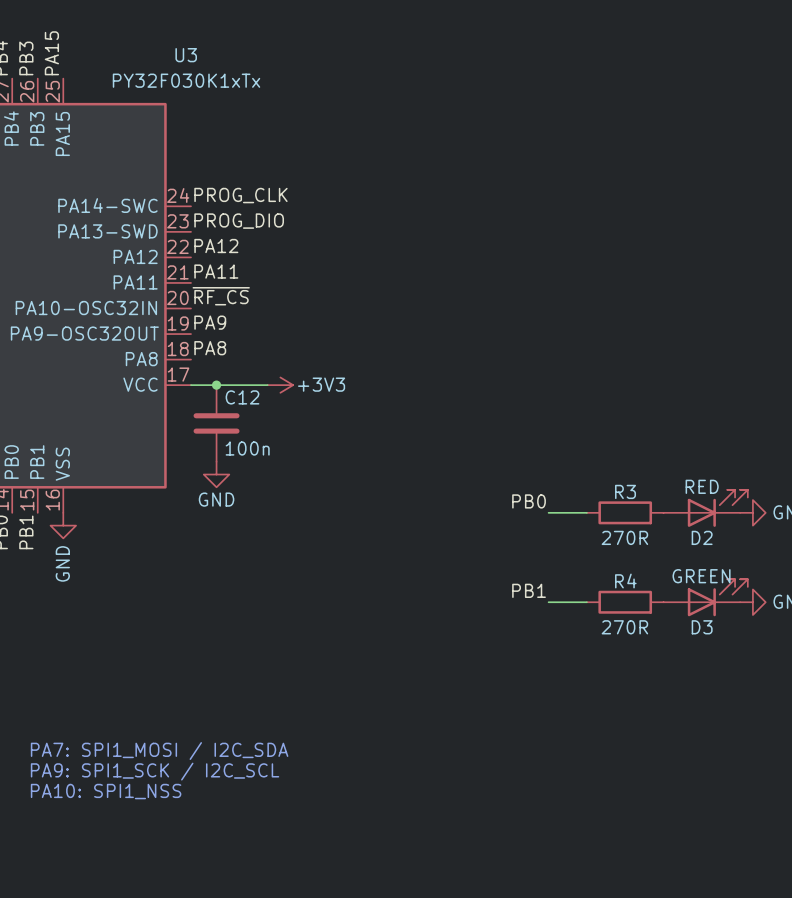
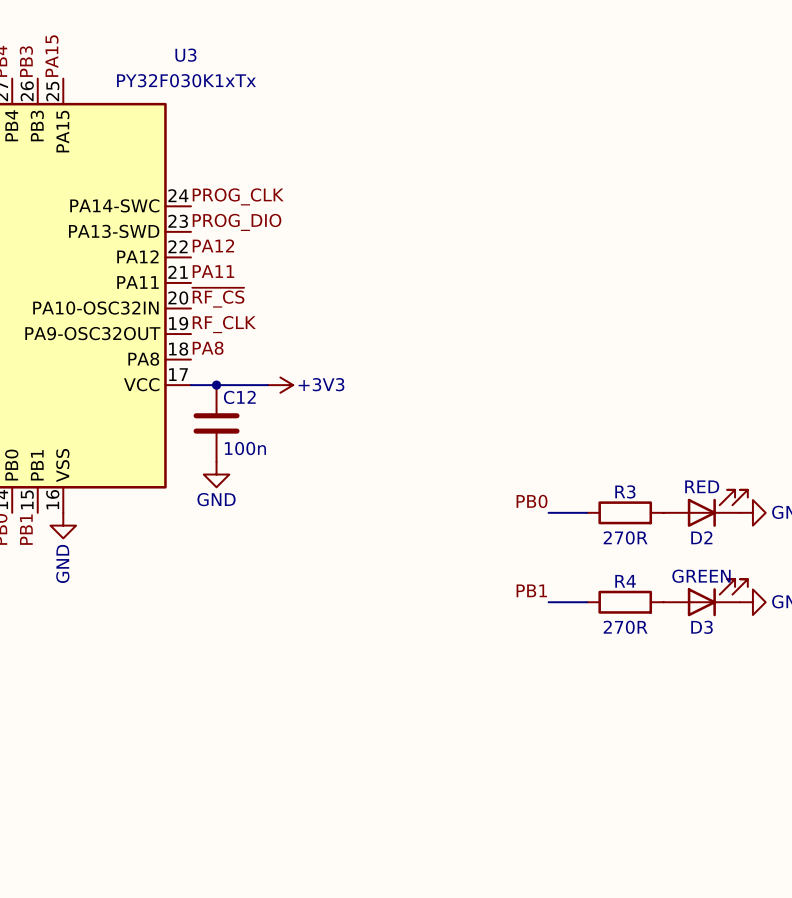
label: PA9 (210, 322) -> RF_CLK (224, 324)
text: PA7: SPI1_MOSI / I2C_SDA (159, 751) -> none
text: PA9: SPI1_SCK / I2C_SCL (155, 771) -> none
text: PA10: SPI1_NSS (106, 791) -> none

